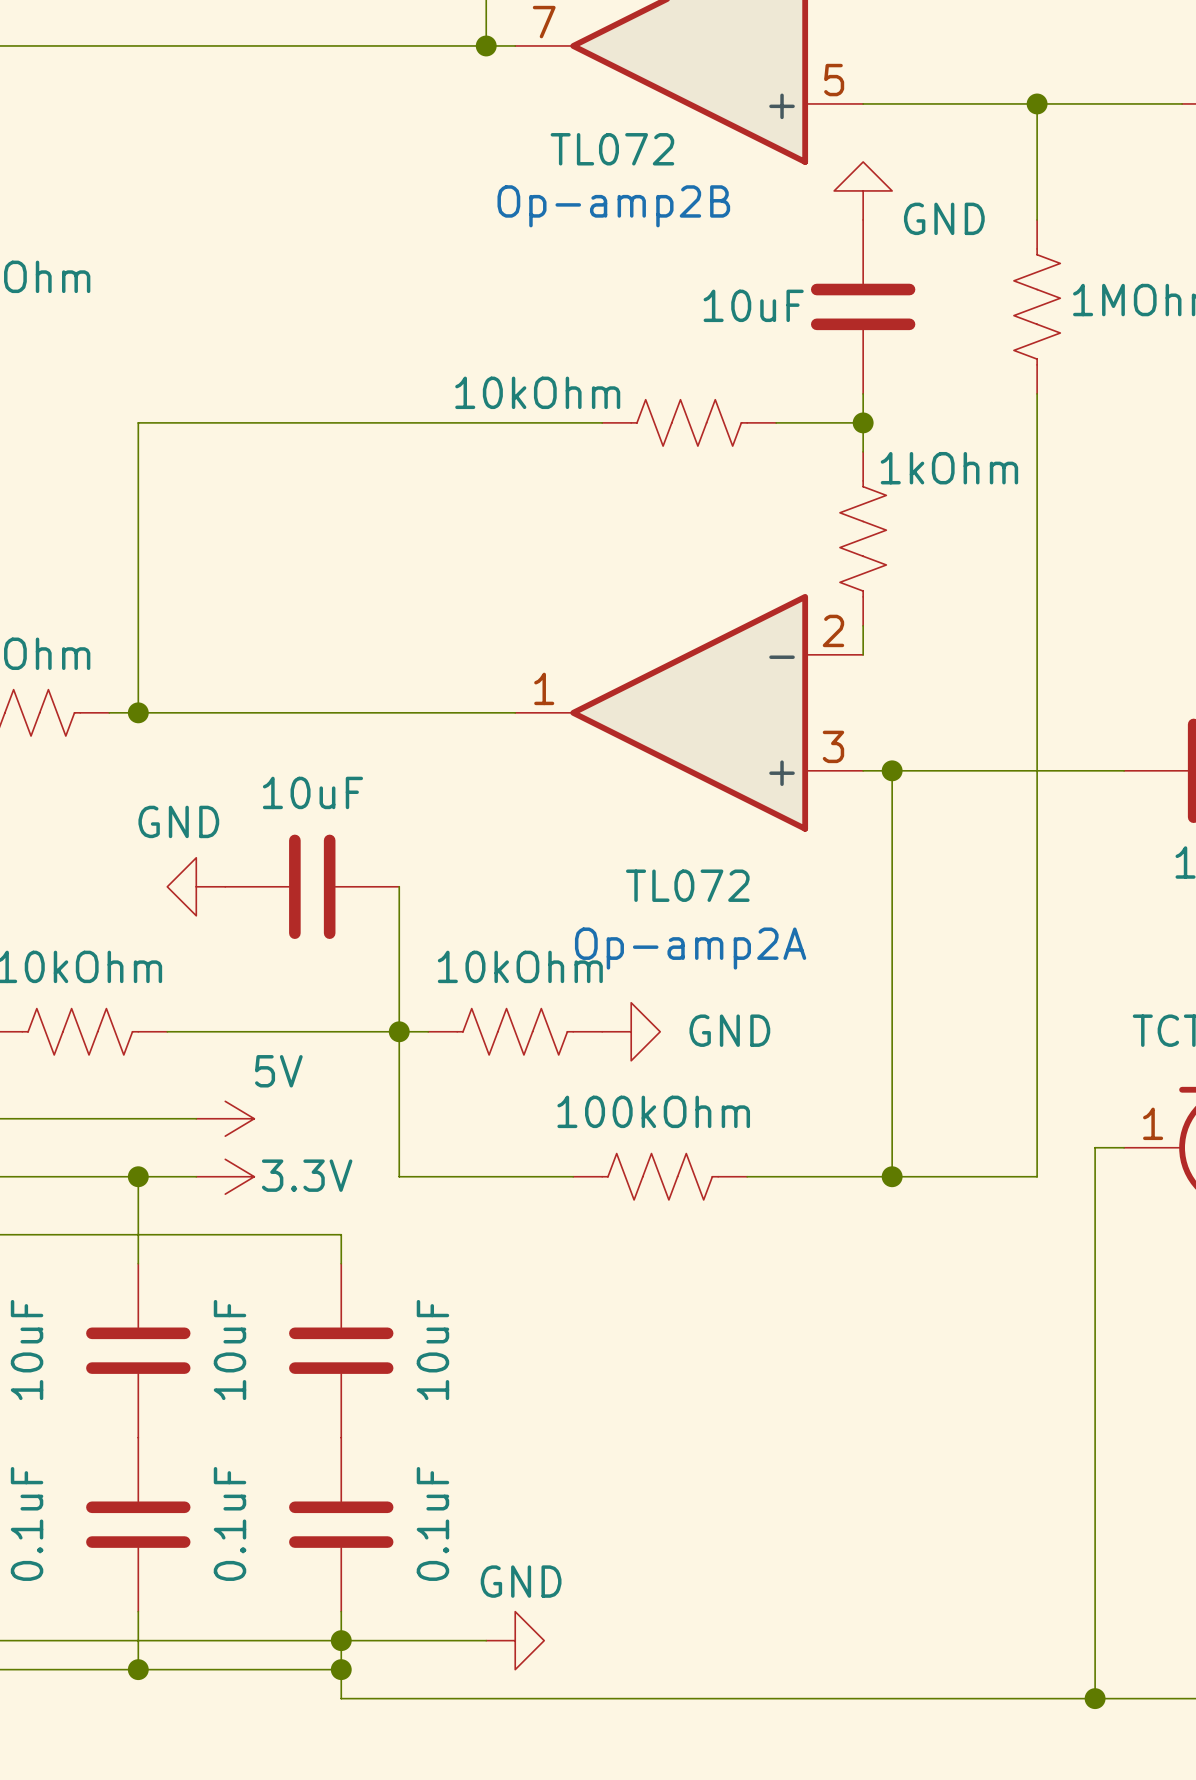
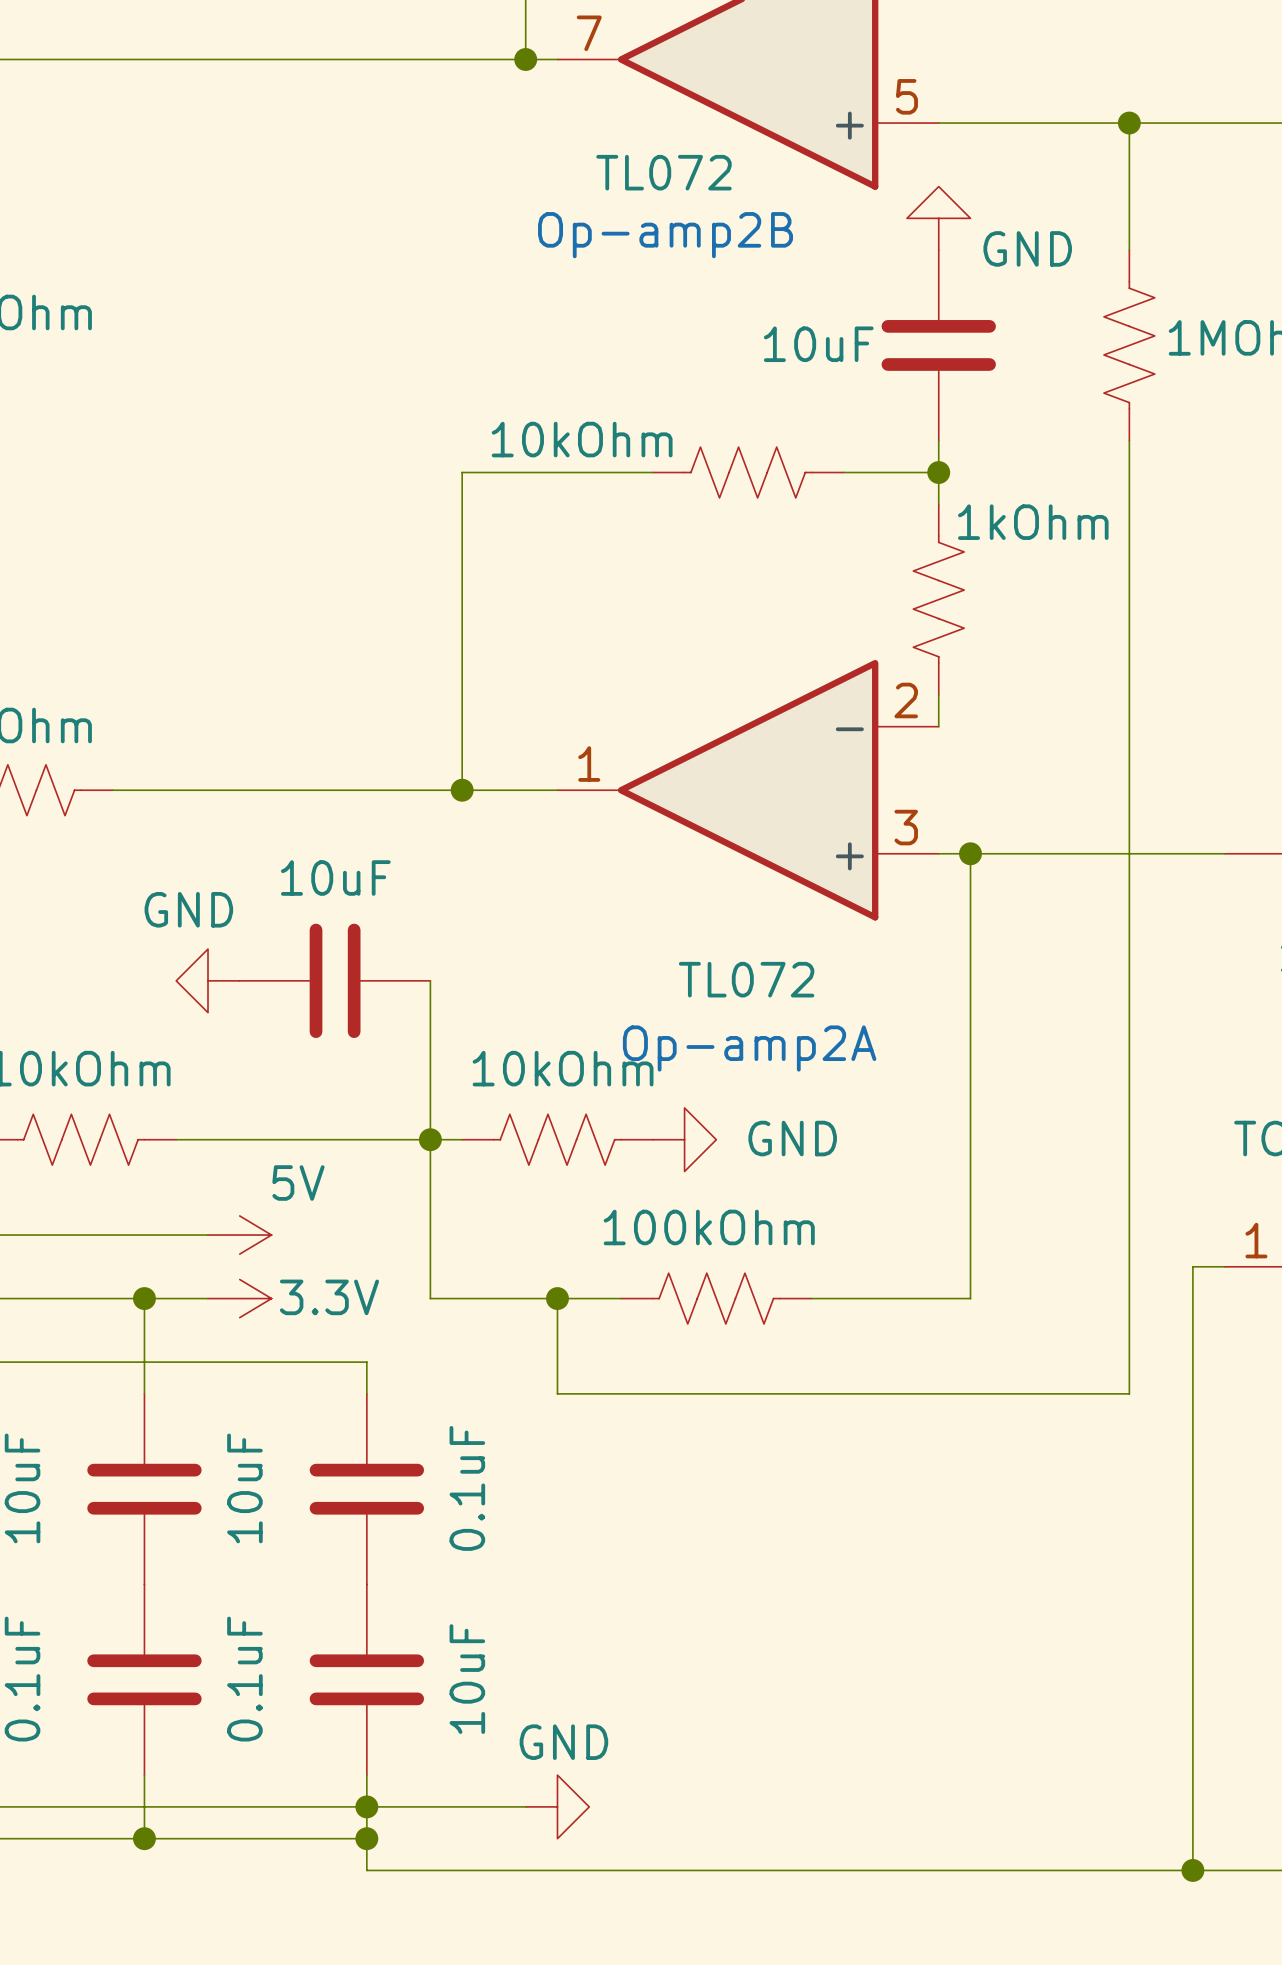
wire: (428, 422) (138, 422) (138, 712) -> (462, 472) (462, 790)
junction: (138, 712) -> none
junction: none -> (462, 790)
junction: none -> (557, 1298)
wire: (892, 1176) (1037, 1176) -> (557, 1298) (557, 1393) (1129, 1393) (1129, 1298)
junction: (892, 1176) -> none
part value: 10uF (432, 1350) -> 0.1uF (467, 1488)
part value: 0.1uF (432, 1523) -> 10uF (467, 1679)

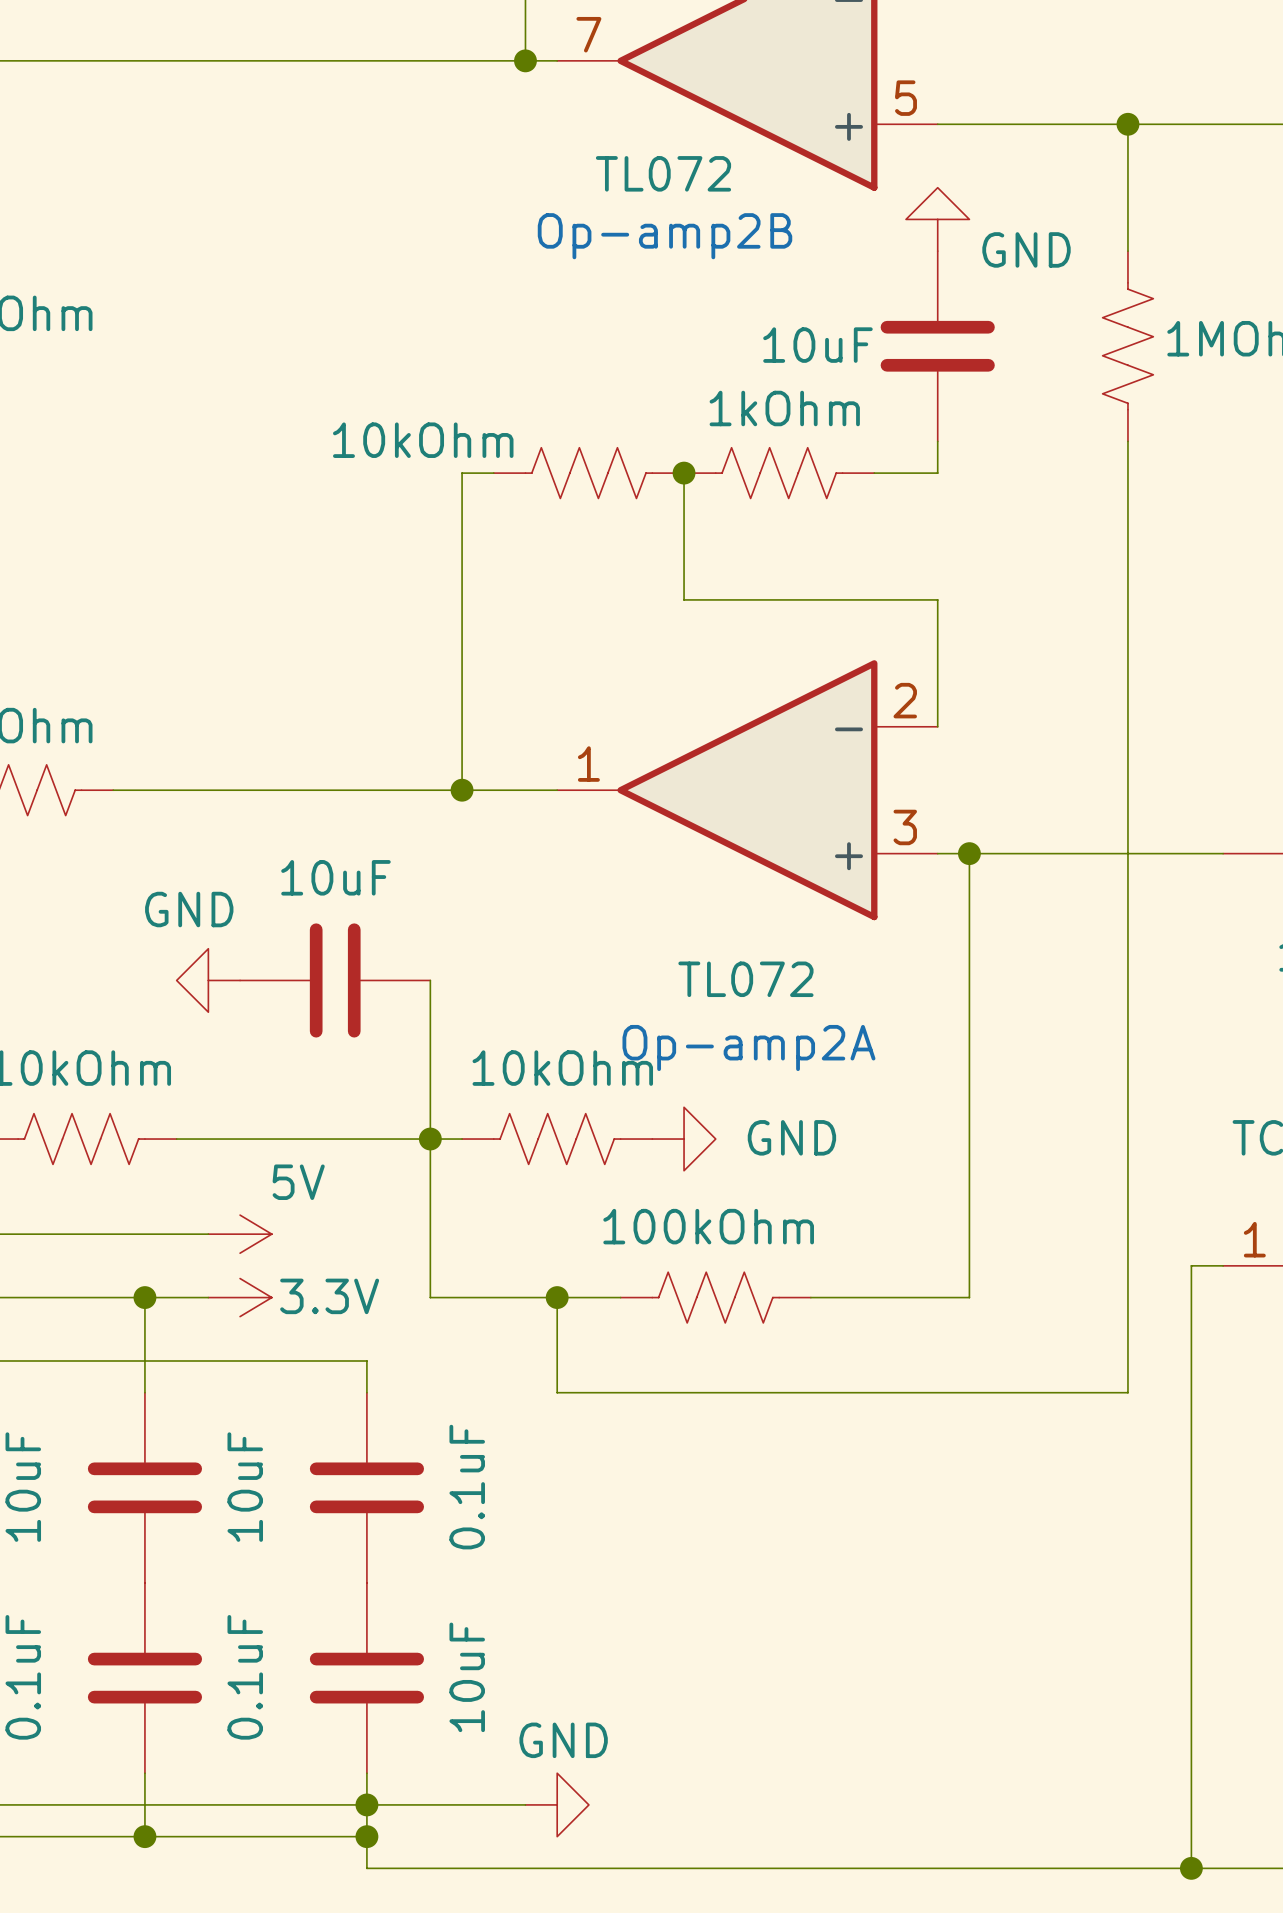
wire: (493, 472) (652, 472) -> none
wire: none -> (684, 473) (684, 599) (937, 599) (937, 695)
junction: none -> (684, 473)
part position: (748, 472) -> (588, 473)
wire: (938, 472) (938, 504) -> none
junction: (938, 472) -> none
part value position: 1kOhm (1033, 522) -> 1kOhm (784, 408)
part rotation: 0° (938, 599) -> 90° clockwise (779, 473)
part position: (938, 599) -> (779, 473)

